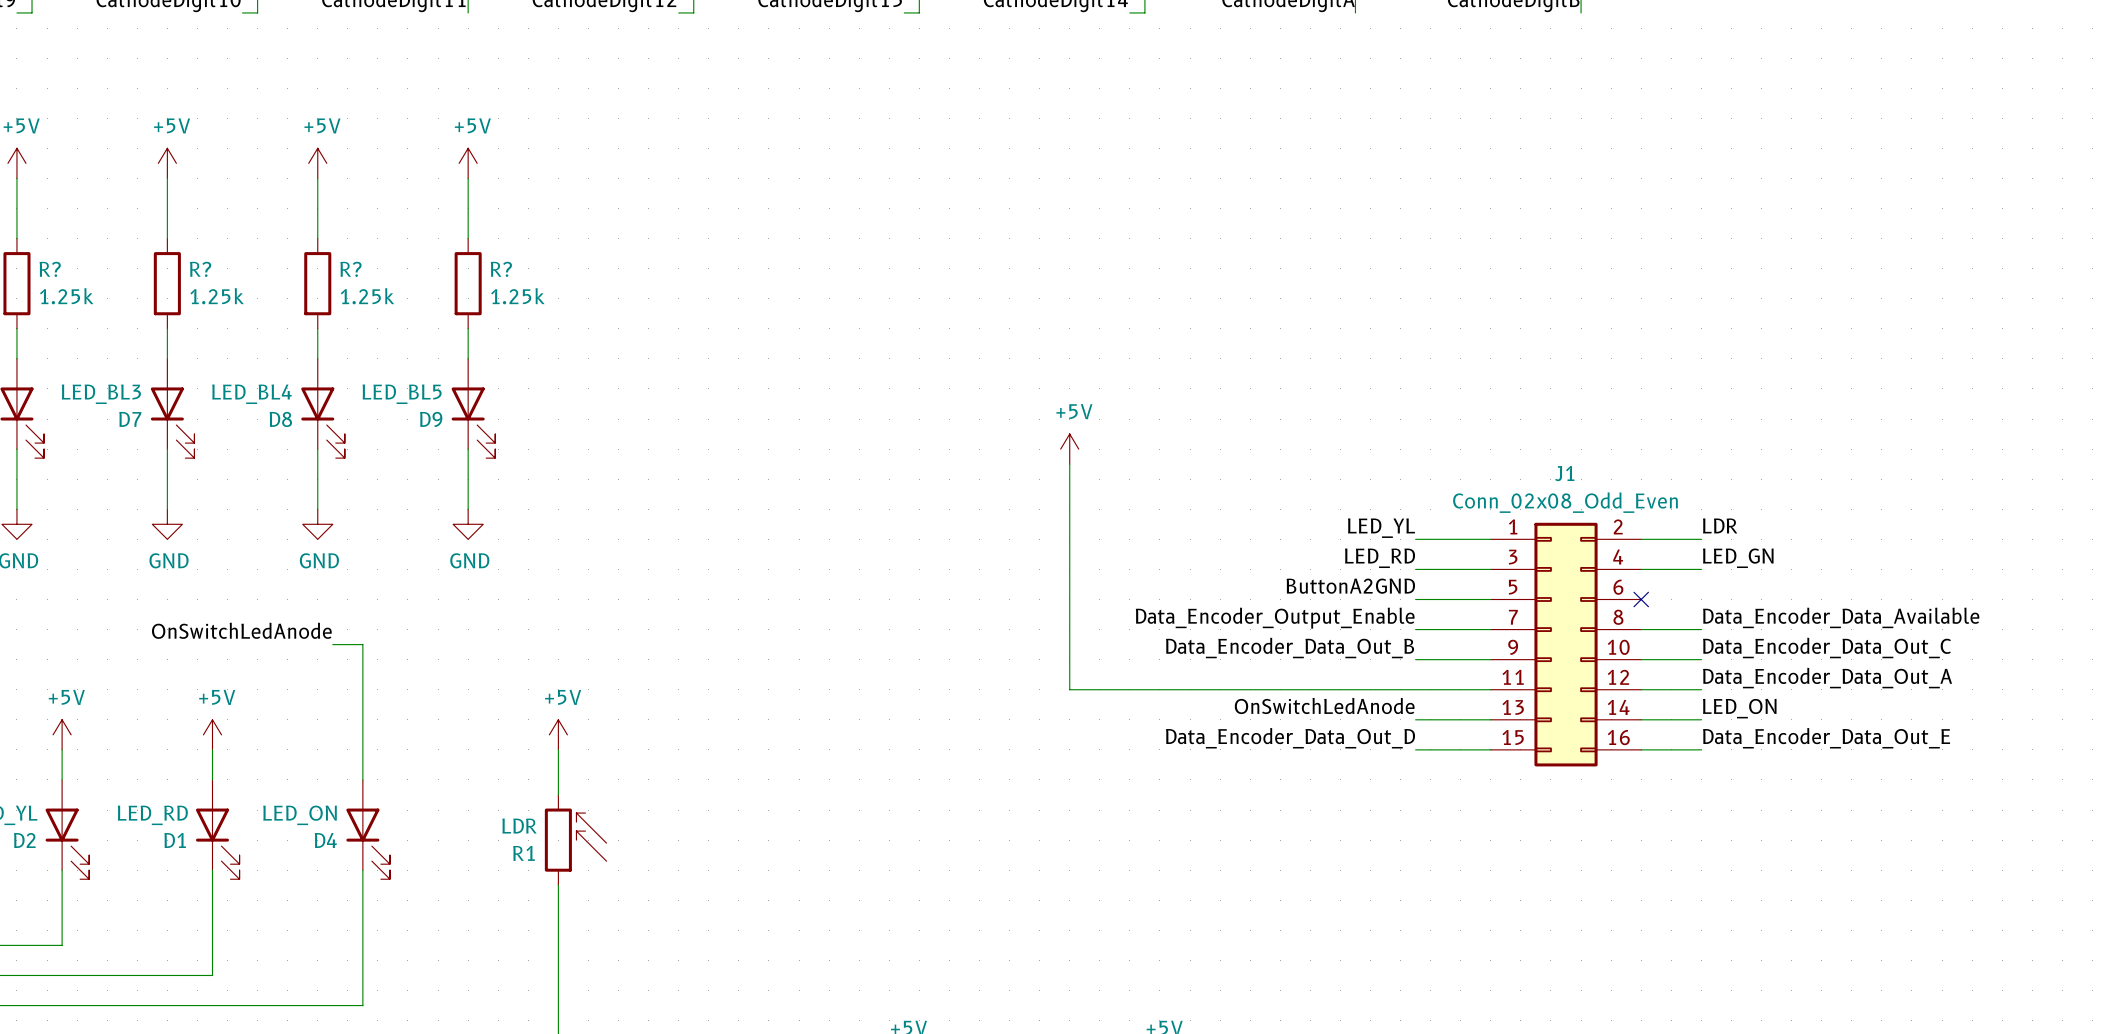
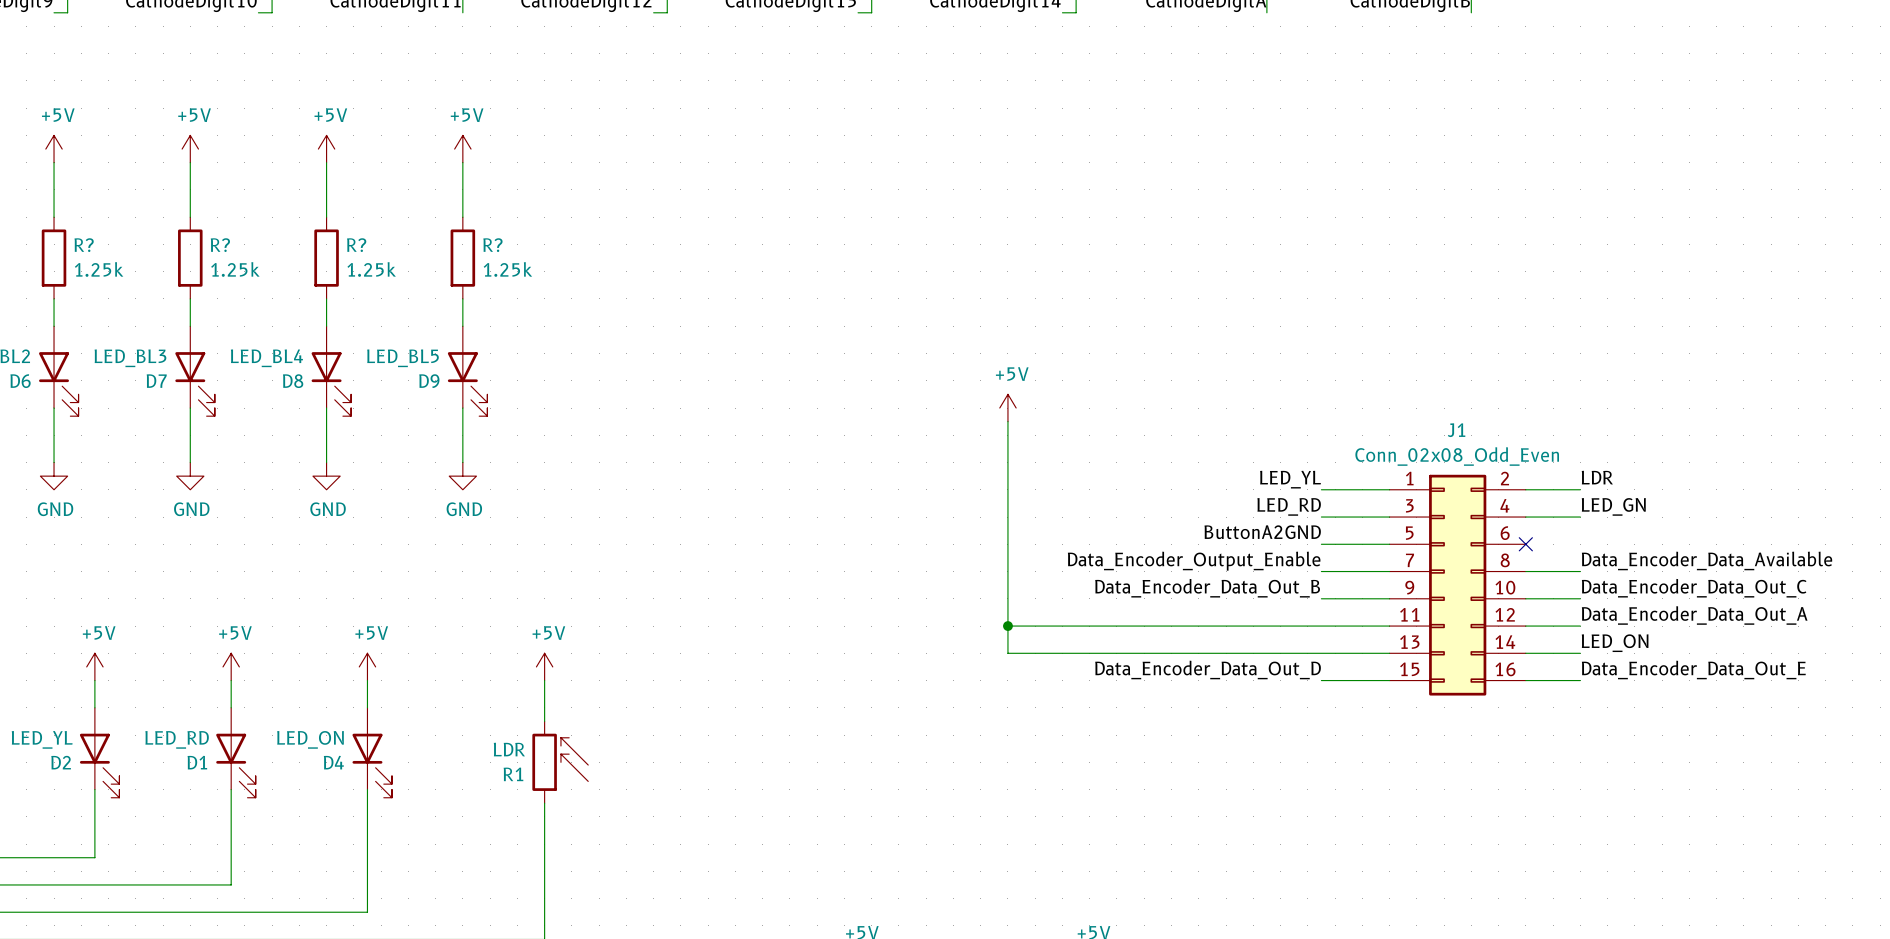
label: OnSwitchLedAnode (241, 630) -> none
wire: (332, 644) (362, 644) (362, 749) -> none
wire: none -> (1007, 626) (1007, 653) (1321, 653)
junction: none -> (1007, 626)
label: OnSwitchLedAnode (1324, 705) -> none
power symbol: none -> +5V (367, 666)

